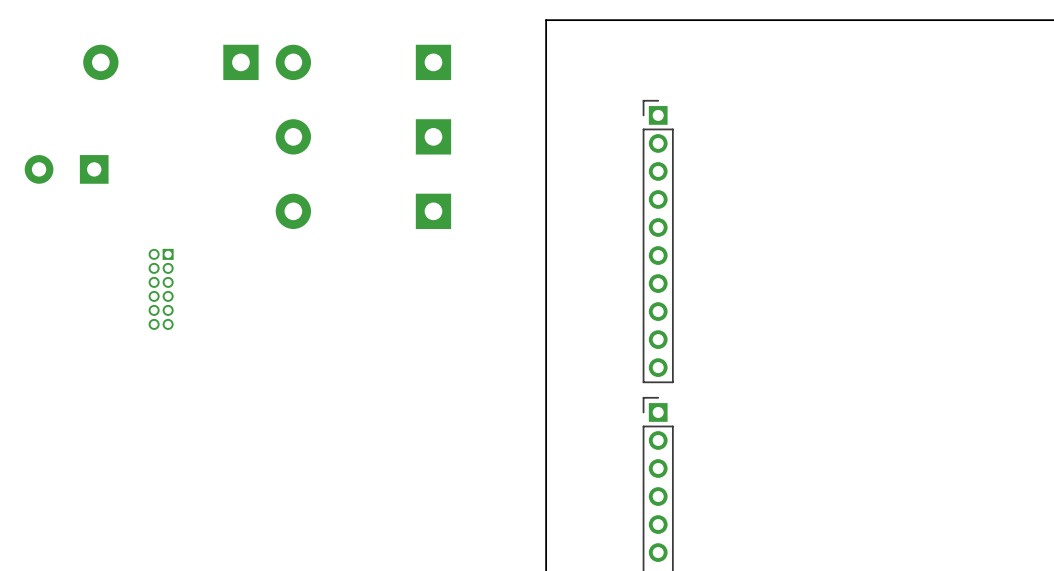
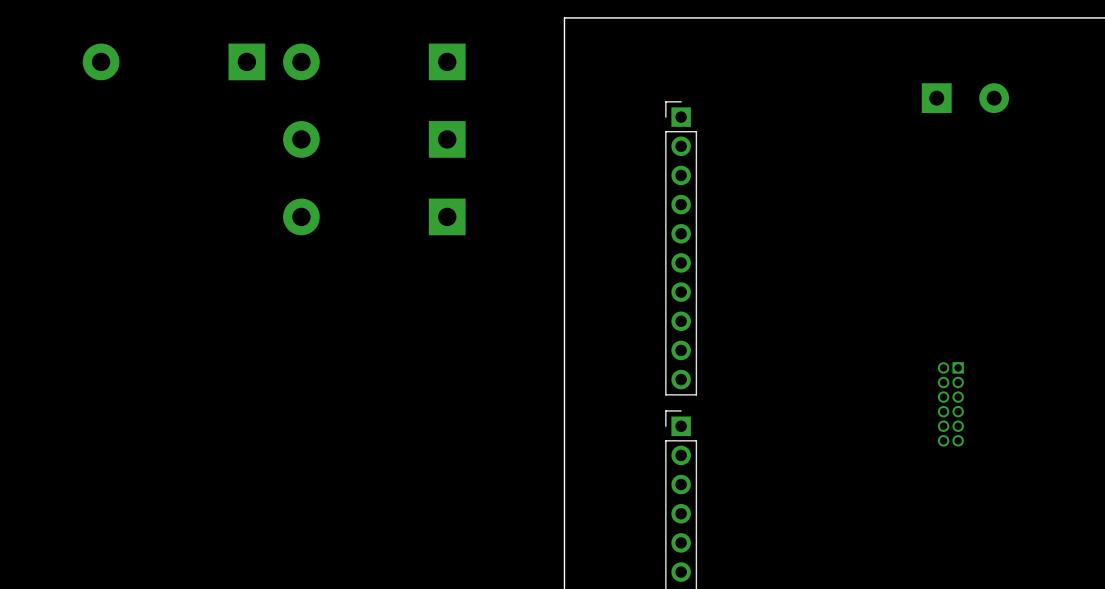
part: none -> (965, 98)
part: (66, 169) -> none
part: (161, 289) -> none
part: none -> (950, 404)

